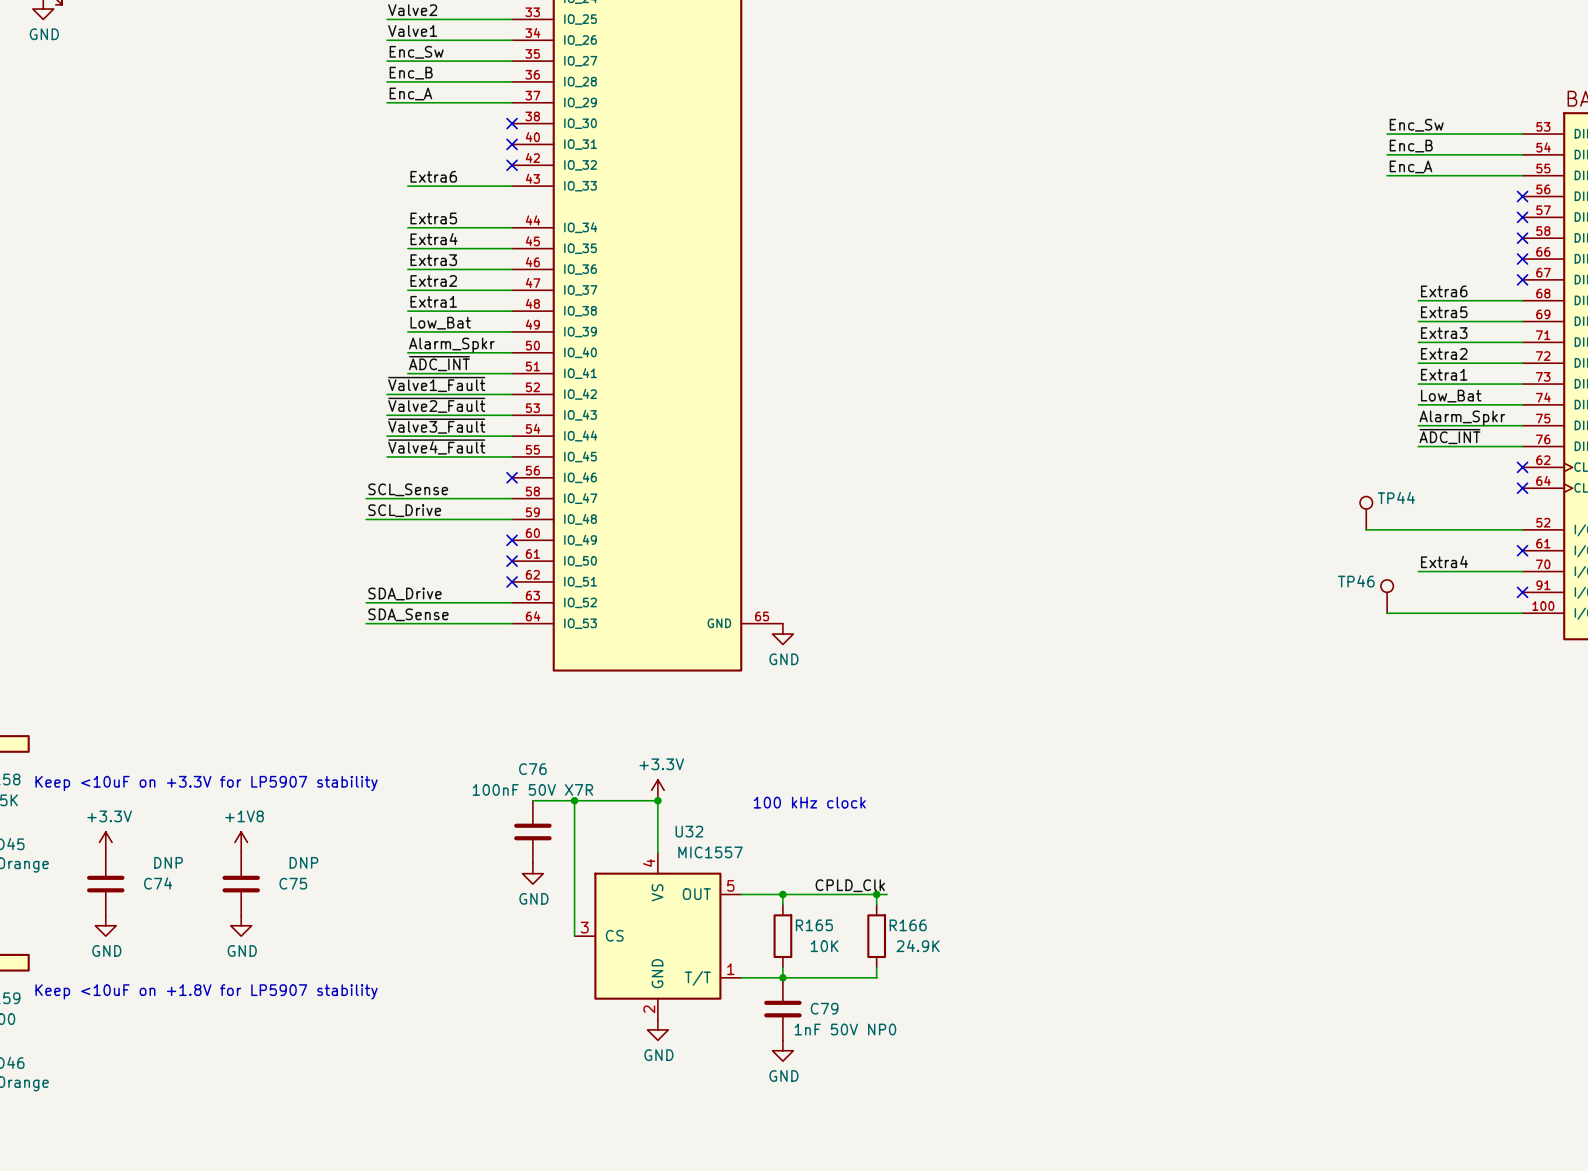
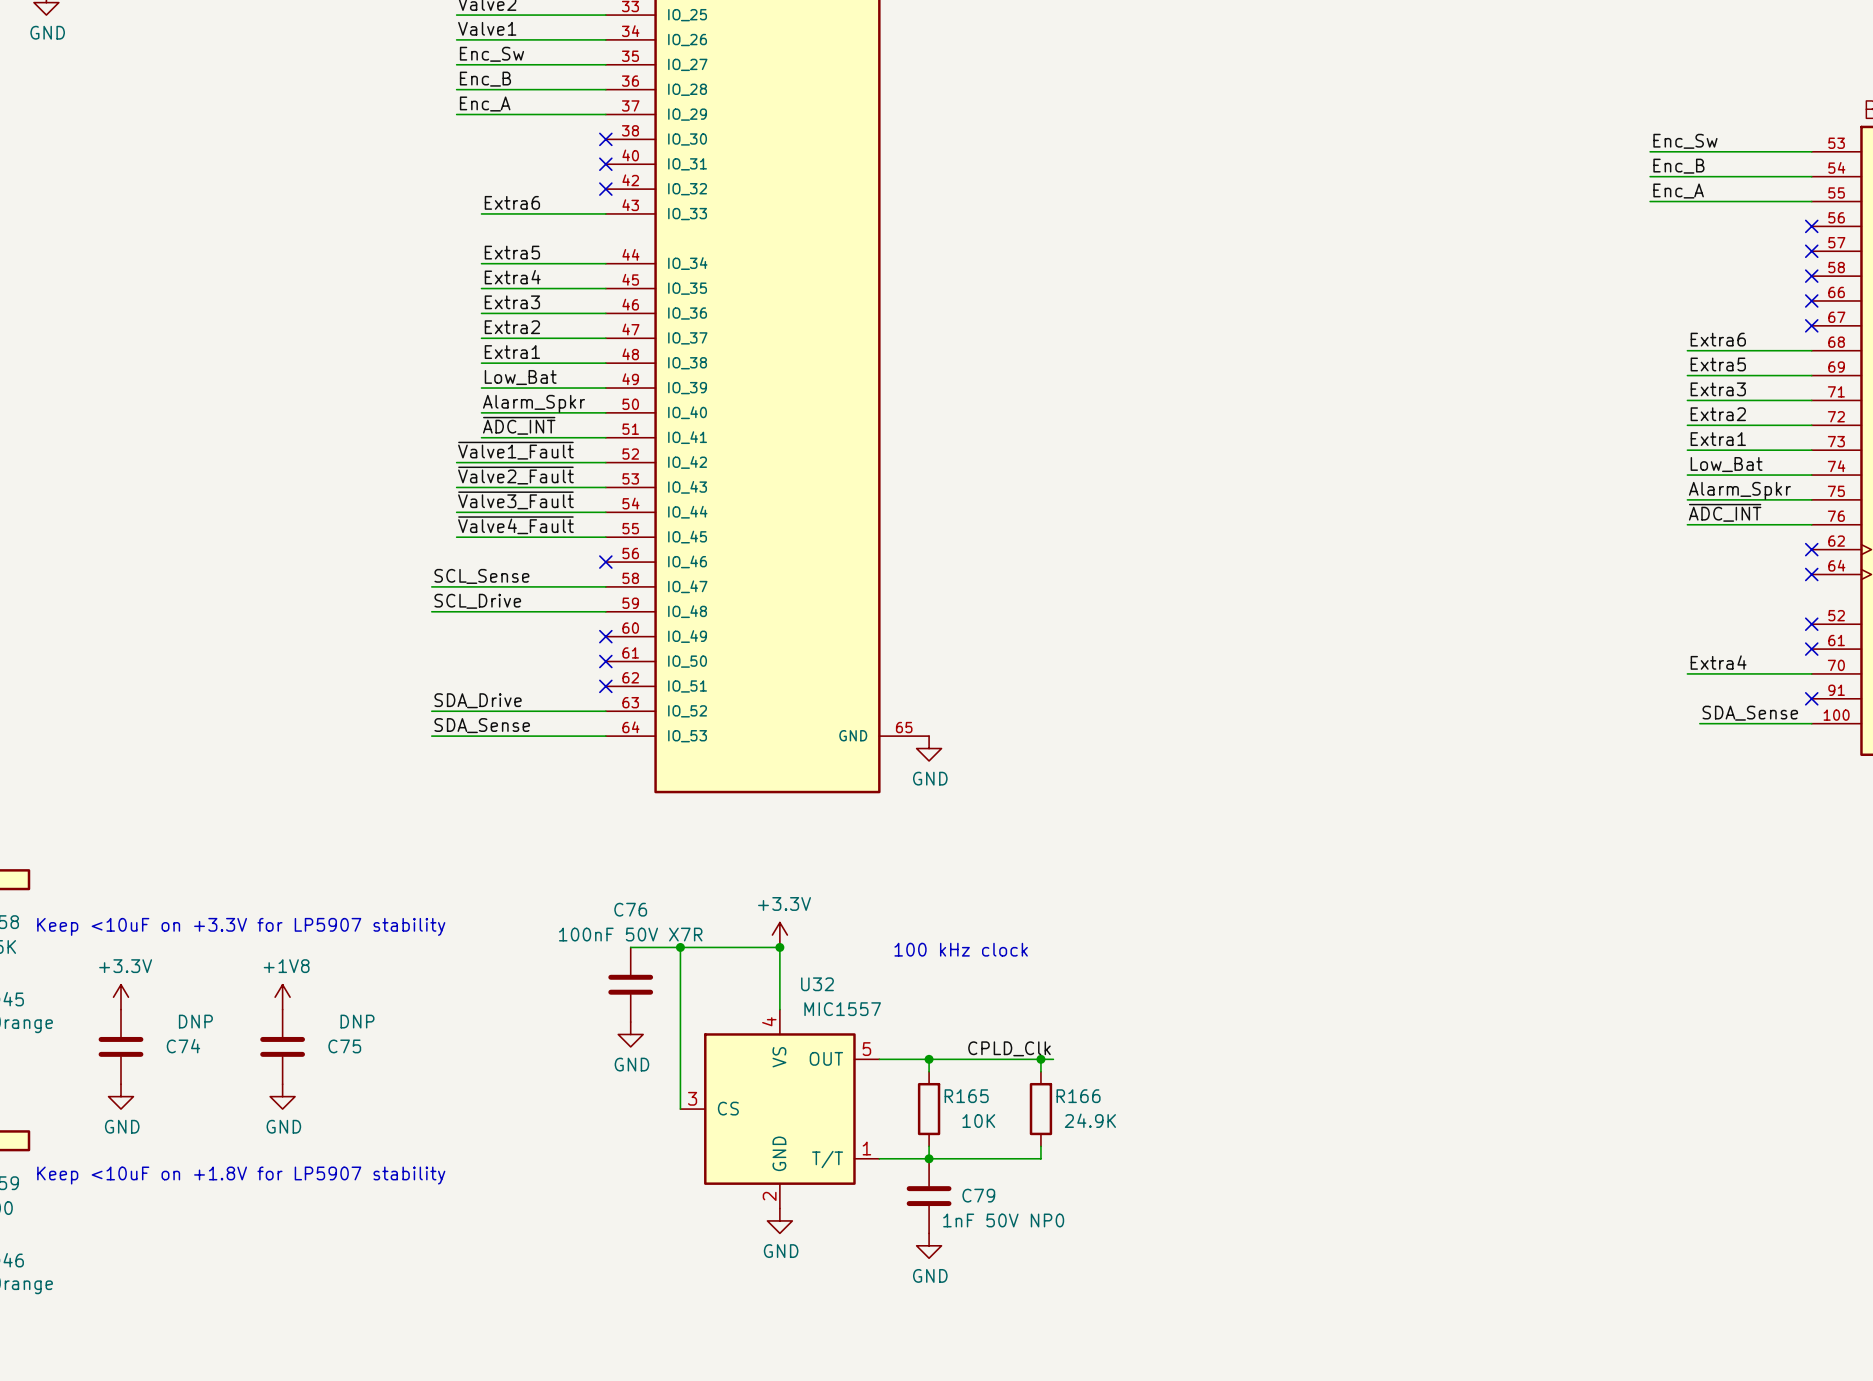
TP44: (1366, 513) -> none
wire: (1366, 529) (1522, 529) -> none
no-connect mark: none -> (1811, 624)
TP46: (1387, 596) -> none
label: none -> SDA_Sense (1750, 713)
wire: (1387, 613) (1428, 613) -> none

